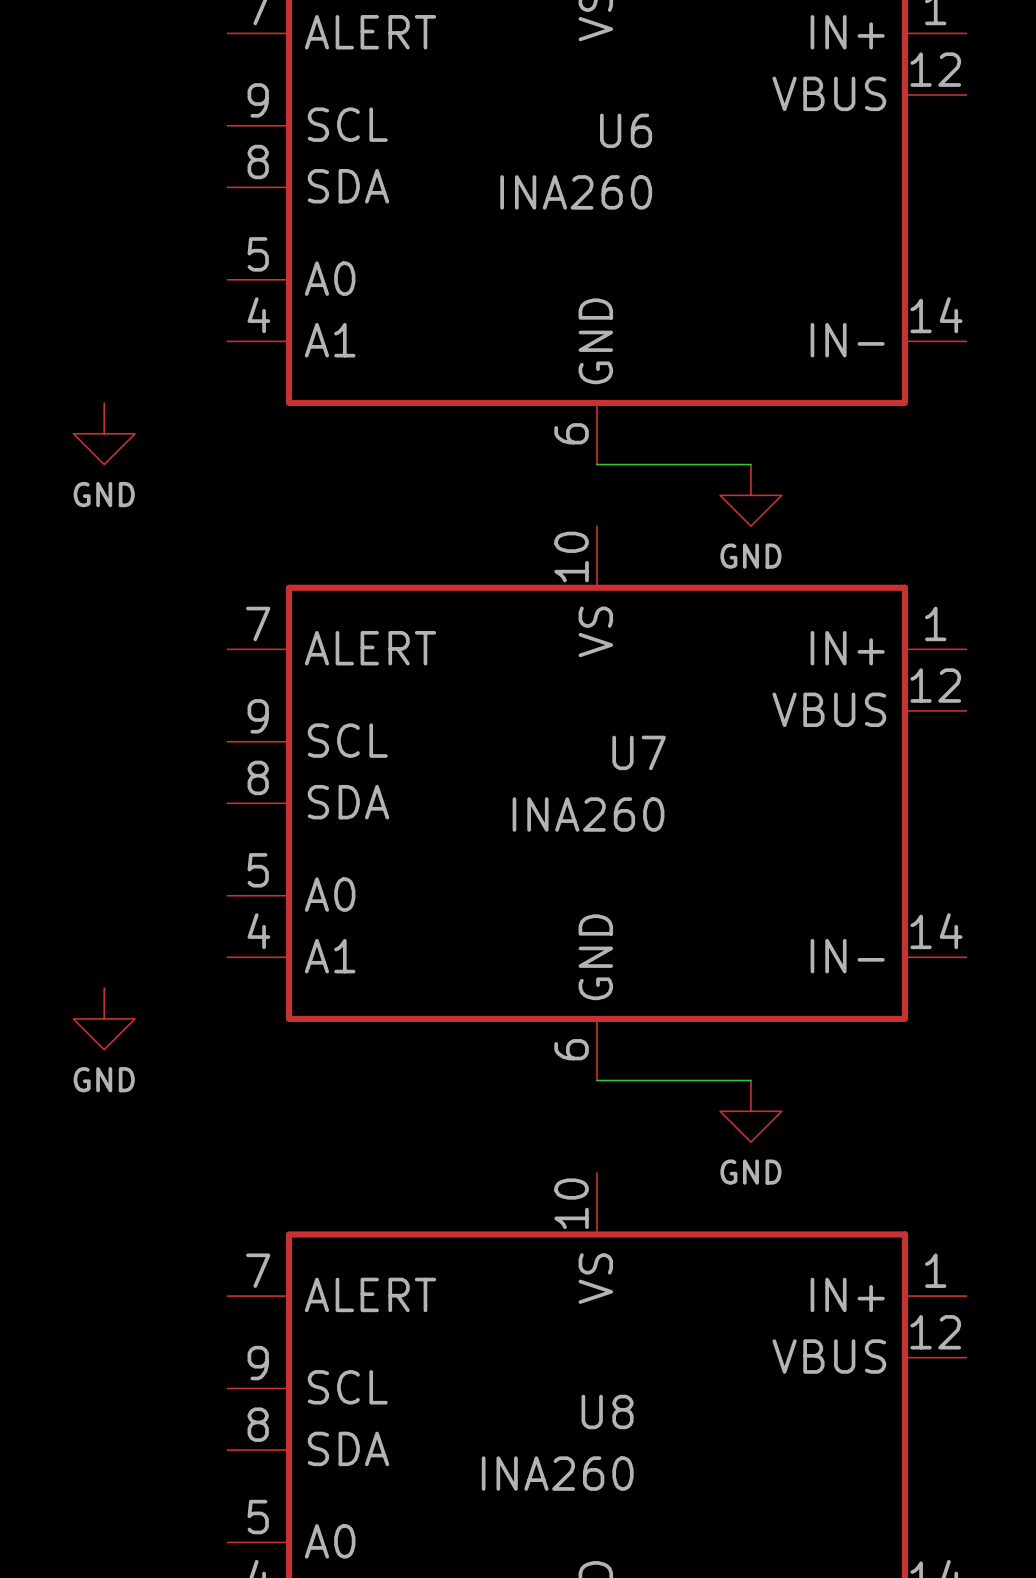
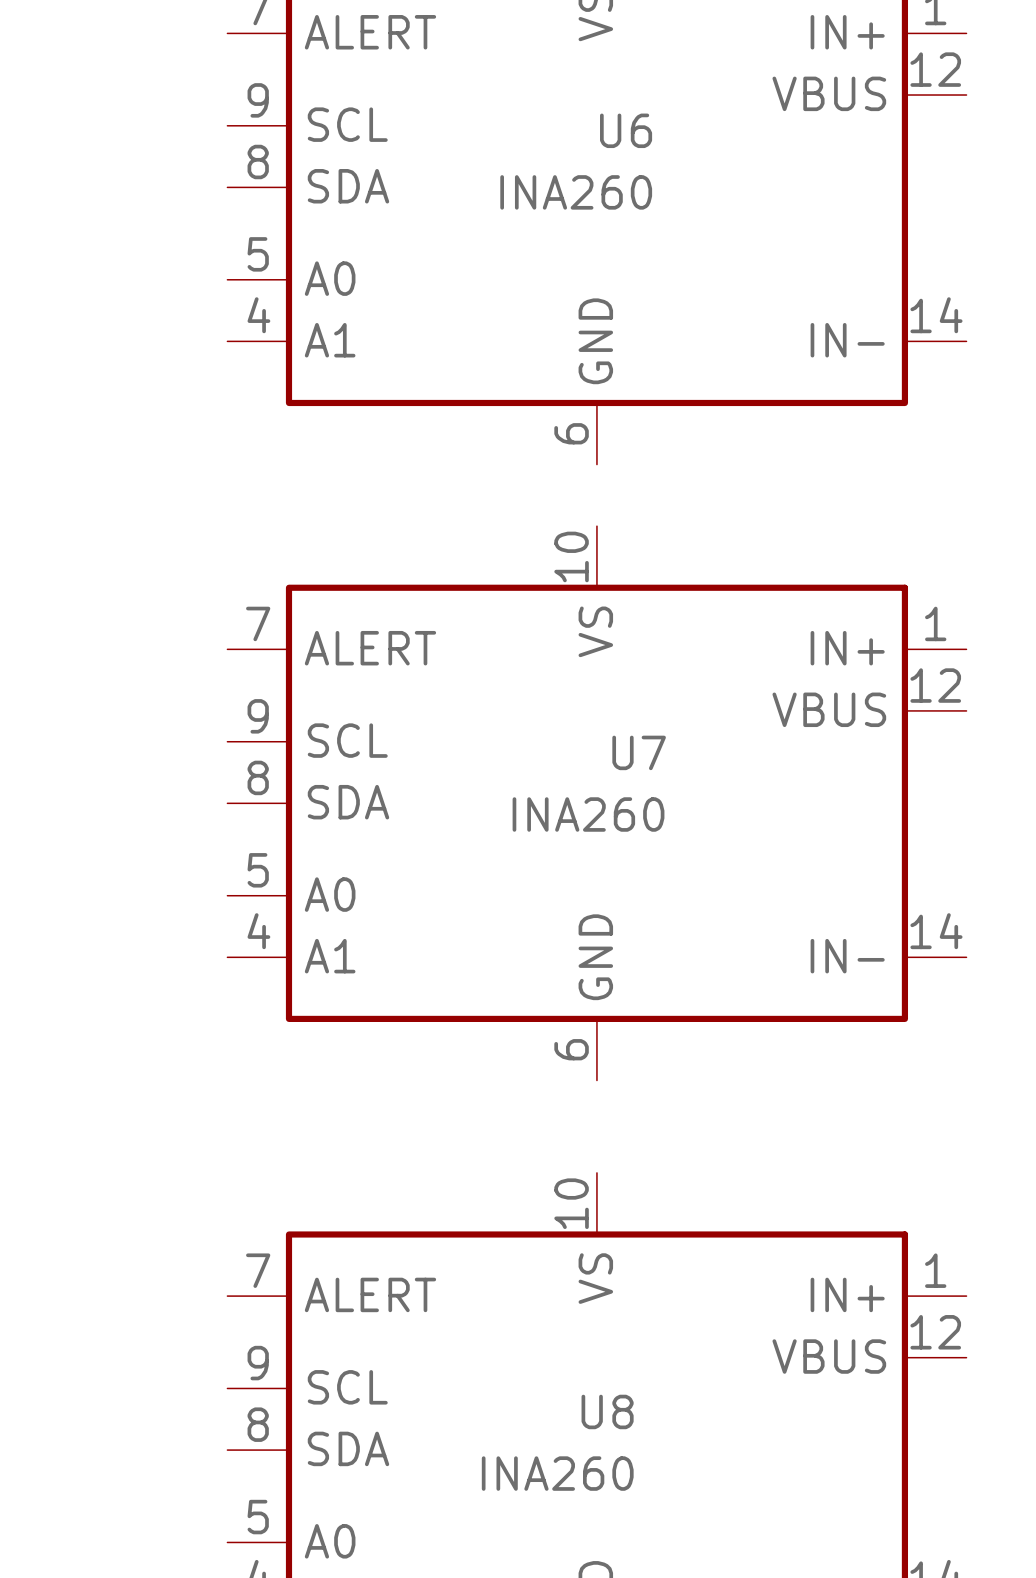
power symbol: GND (104, 433) -> none
wire: (596, 464) (750, 464) -> none
power symbol: GND (750, 495) -> none
power symbol: GND (104, 1018) -> none
wire: (596, 1080) (750, 1080) -> none
power symbol: GND (750, 1111) -> none

